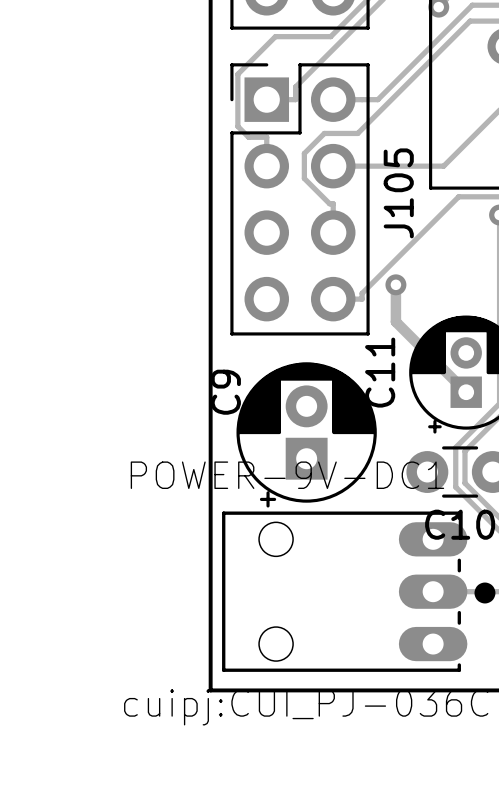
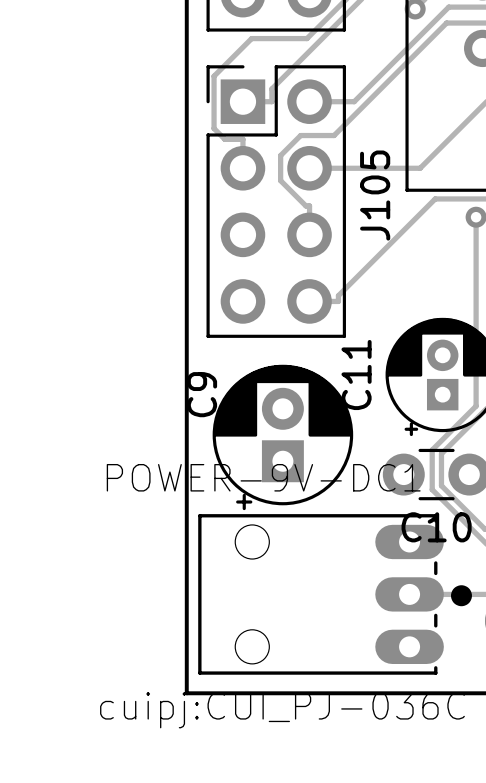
track: (395, 284) (395, 321) (466, 392) -> none
via: (395, 284) -> none

